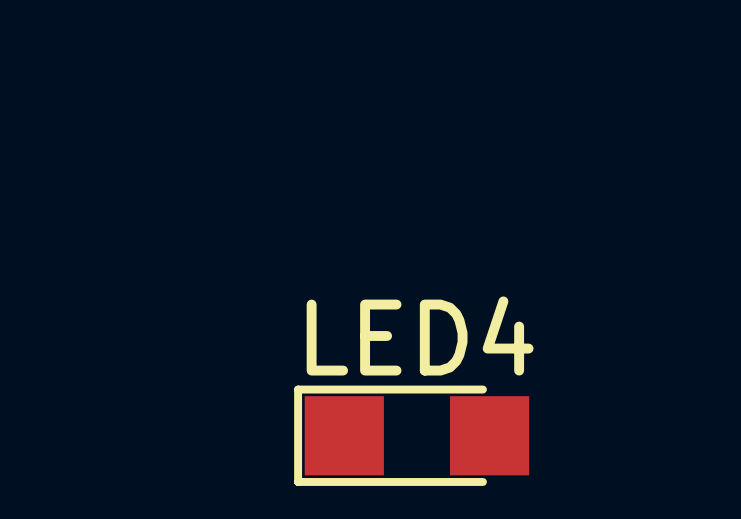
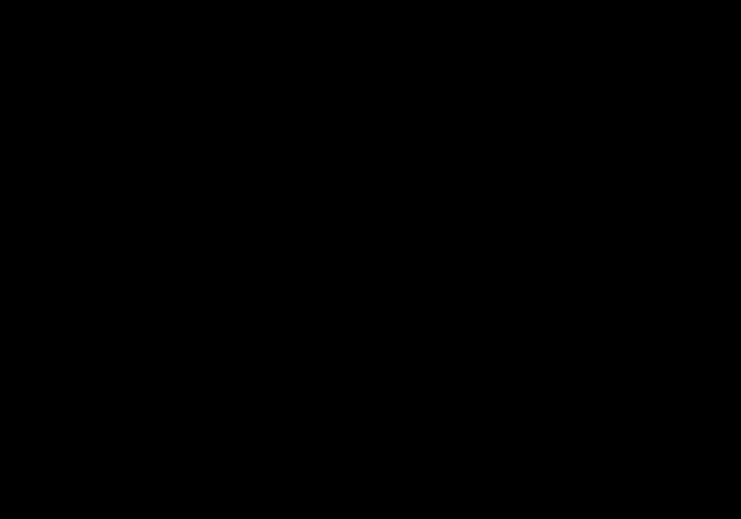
LED4: (411, 435) -> none

